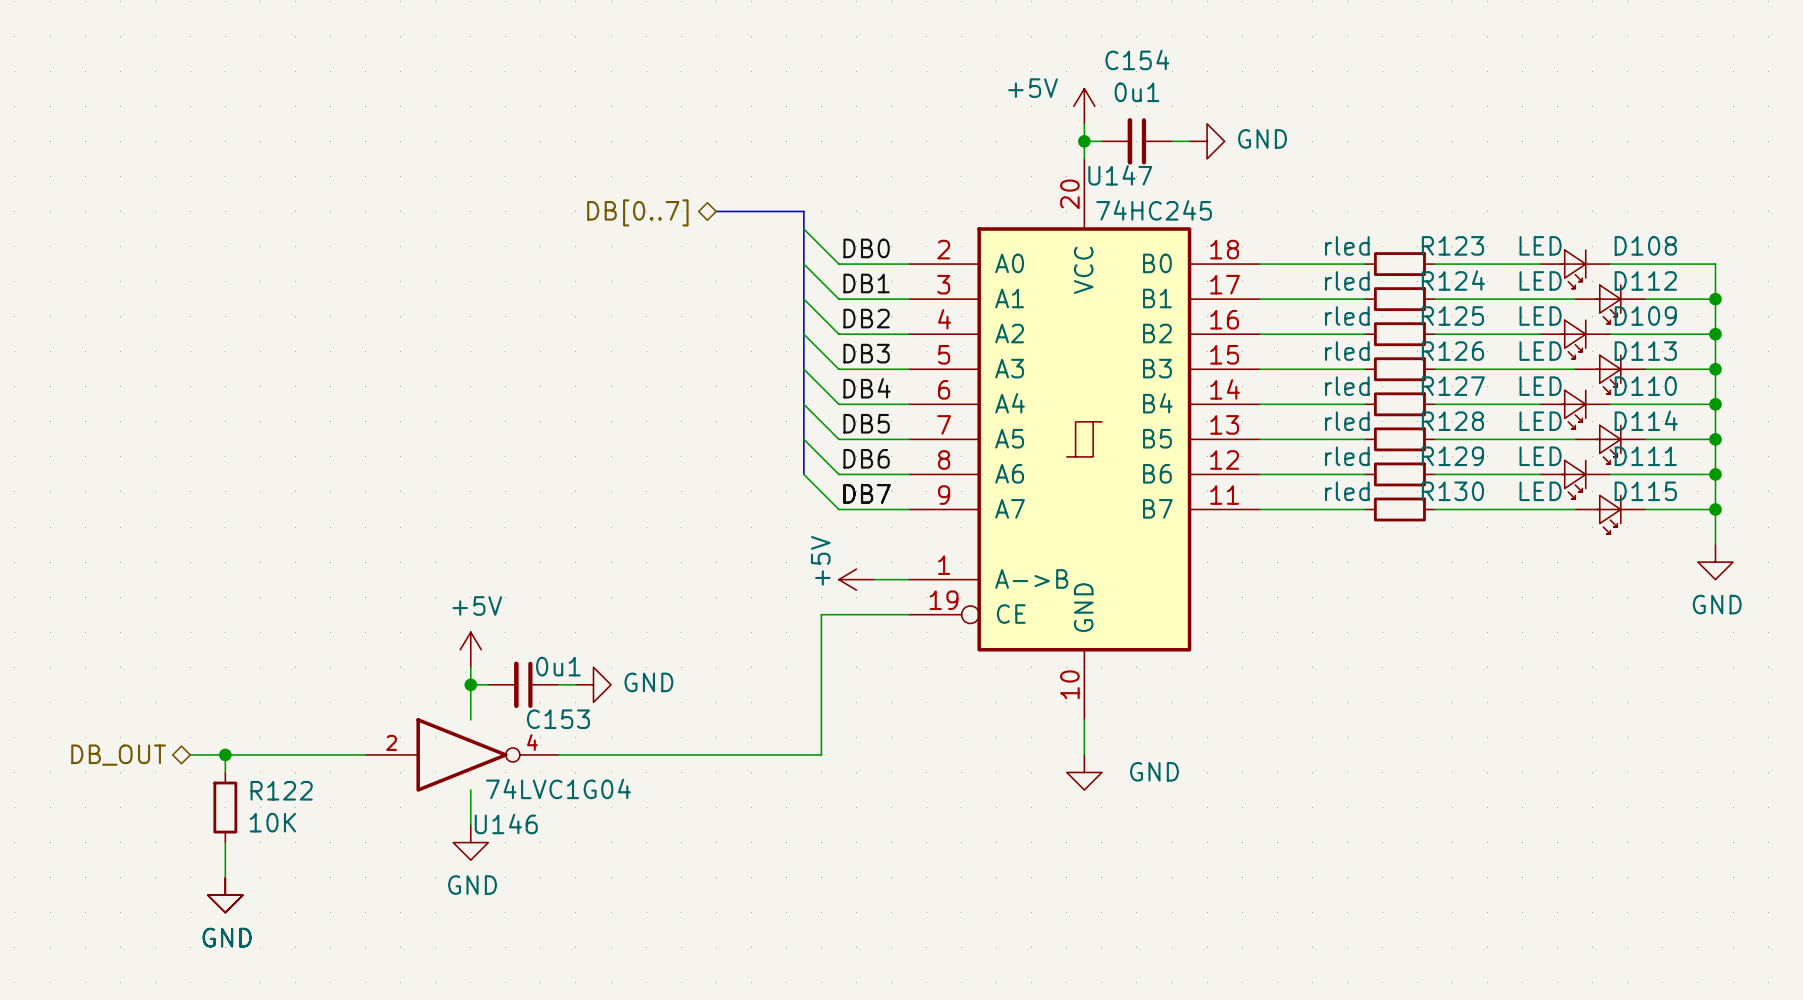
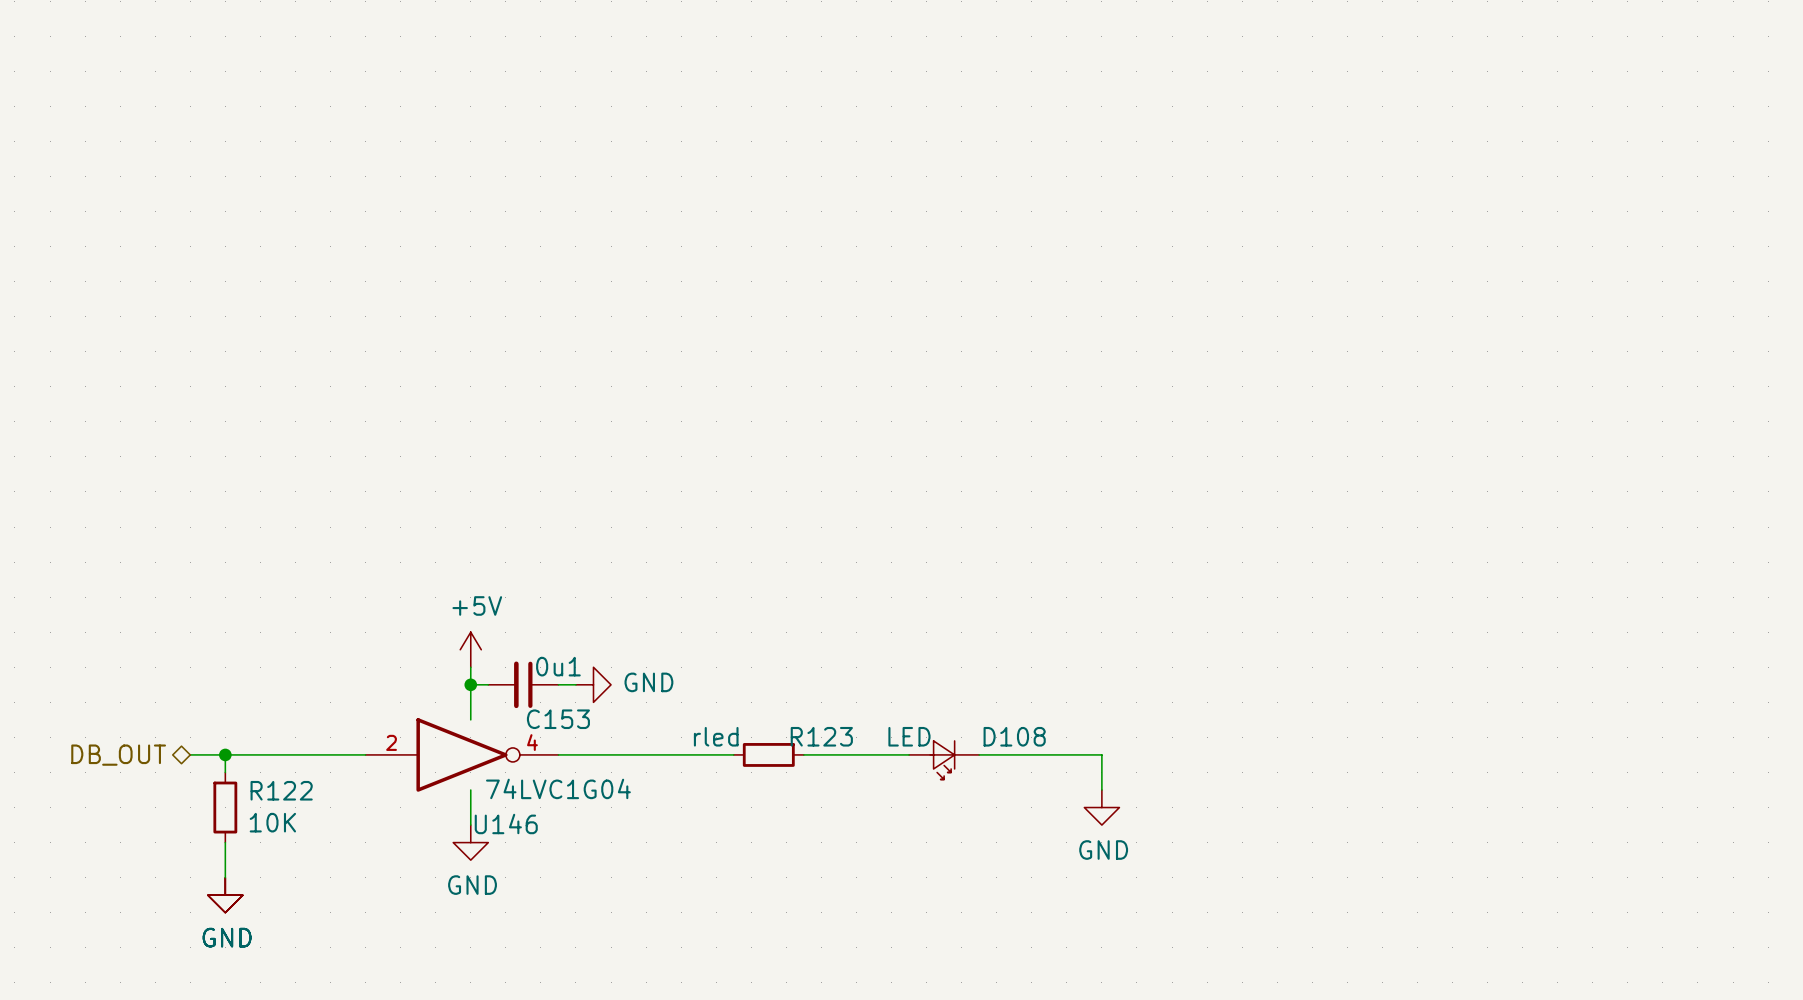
power symbol: +5V (1084, 106) -> none
wire: (1084, 123) (1084, 158) -> none
wire: (1084, 141) (1101, 141) -> none
junction: (1084, 141) -> none
C154: 0u1 (1136, 141) -> none
wire: (1172, 141) (1189, 141) -> none
power symbol: GND (1207, 141) -> none
bus: (716, 211) (803, 211) (803, 474) -> none
hierarchical label: DB[0..7] (637, 212) -> none
wire: (803, 229) (838, 264) (909, 264) -> none
label: DB0 (866, 248) -> none
wire: (803, 264) (838, 299) (909, 299) -> none
wire: (1259, 264) (1364, 264) -> none
R123 position: (1399, 264) -> (768, 754)
wire: (1434, 264) (1540, 264) -> none
wire: (1610, 264) (1715, 264) (1715, 544) -> none
D108 position: (1575, 269) -> (944, 760)
label: DB1 (866, 283) -> none
wire: (803, 299) (838, 334) (909, 334) -> none
wire: (1259, 299) (1364, 299) -> none
R124: rled (1399, 299) -> none
wire: (1434, 299) (1575, 299) -> none
wire: (1645, 299) (1715, 299) -> none
junction: (1715, 299) -> none
D112: LED (1610, 304) -> none
label: DB2 (866, 318) -> none
wire: (803, 334) (838, 369) (909, 369) -> none
wire: (1259, 334) (1364, 334) -> none
R125: rled (1399, 334) -> none
wire: (1434, 334) (1540, 334) -> none
wire: (1610, 334) (1715, 334) -> none
junction: (1715, 334) -> none
D109: LED (1575, 339) -> none
label: DB3 (866, 353) -> none
wire: (803, 369) (838, 404) (909, 404) -> none
wire: (1259, 369) (1364, 369) -> none
R126: rled (1399, 369) -> none
wire: (1434, 369) (1575, 369) -> none
wire: (1645, 369) (1715, 369) -> none
junction: (1715, 369) -> none
D113: LED (1610, 374) -> none
label: DB4 (867, 388) -> none
wire: (803, 404) (838, 439) (909, 439) -> none
wire: (1259, 404) (1364, 404) -> none
R127: rled (1399, 404) -> none
wire: (1434, 404) (1540, 404) -> none
wire: (1610, 404) (1715, 404) -> none
junction: (1715, 404) -> none
D110: LED (1575, 409) -> none
label: DB5 (866, 423) -> none
wire: (803, 439) (838, 474) (909, 474) -> none
U147: 74HC245 (1084, 439) -> none
wire: (1259, 439) (1364, 439) -> none
R128: rled (1399, 439) -> none
wire: (1434, 439) (1575, 439) -> none
wire: (1645, 439) (1715, 439) -> none
junction: (1715, 439) -> none
D114: LED (1610, 444) -> none
label: DB6 (866, 458) -> none
wire: (803, 474) (838, 509) (909, 509) -> none
wire: (1259, 474) (1364, 474) -> none
R129: rled (1399, 474) -> none
wire: (1434, 474) (1540, 474) -> none
wire: (1610, 474) (1715, 474) -> none
junction: (1715, 474) -> none
D111: LED (1575, 479) -> none
label: DB7 (867, 493) -> none
wire: (1259, 509) (1364, 509) -> none
R130: rled (1399, 509) -> none
wire: (1434, 509) (1575, 509) -> none
wire: (1645, 509) (1715, 509) -> none
junction: (1715, 509) -> none
D115: LED (1610, 514) -> none
power symbol: GND (1715, 562) -> none
power symbol: +5V (856, 579) -> none
wire: (873, 579) (909, 579) -> none
wire: (909, 614) (821, 614) (821, 754) -> (909, 754) (821, 754)
wire: (1084, 719) (1084, 754) -> none
wire: (733, 754) (803, 754) -> none
wire: none -> (979, 754) (1101, 754) (1101, 790)
power symbol text position: GND (1154, 771) -> GND (1103, 850)
power symbol position: GND (1084, 772) -> GND (1101, 807)

